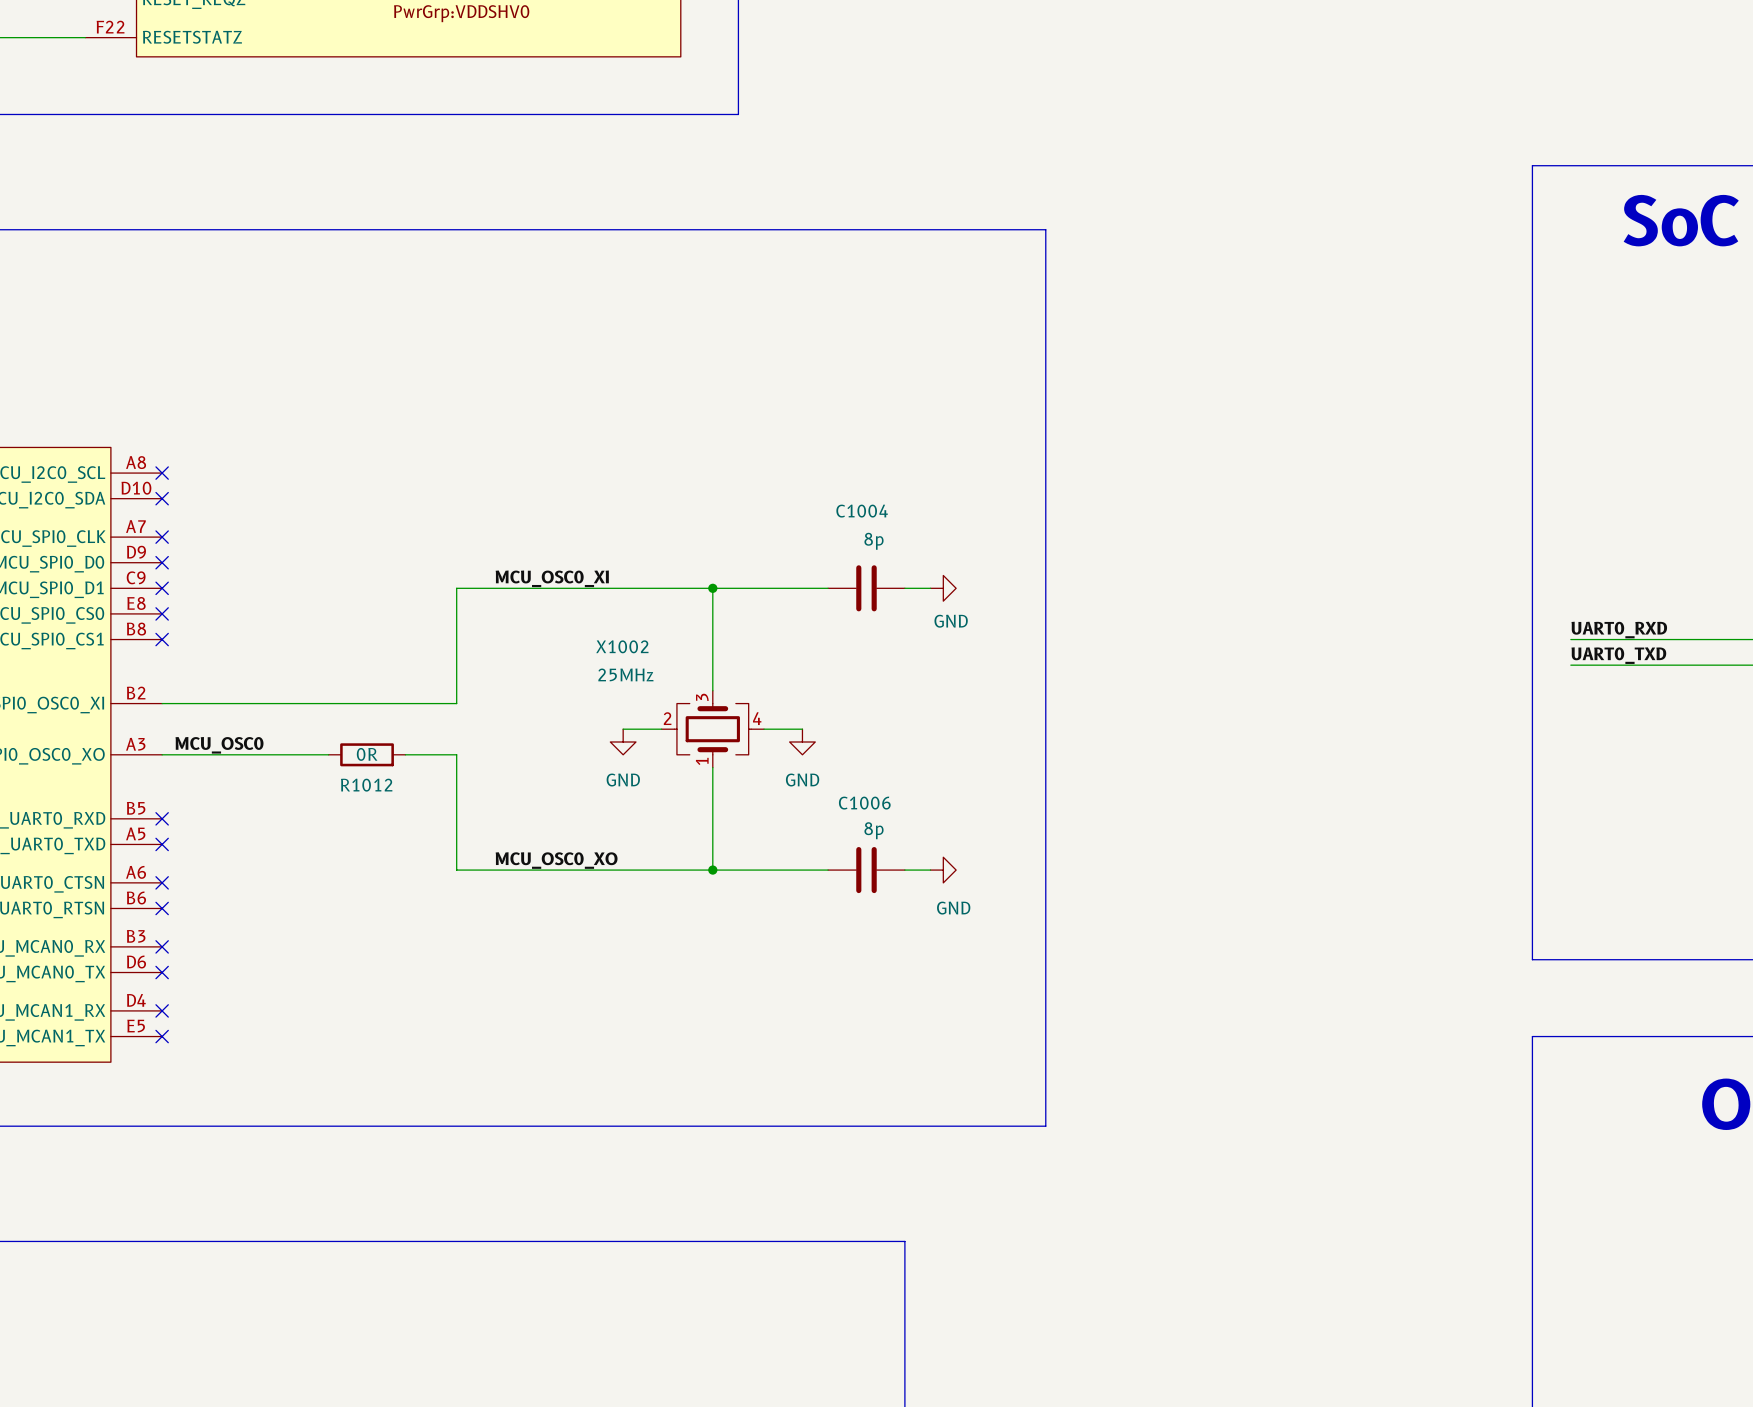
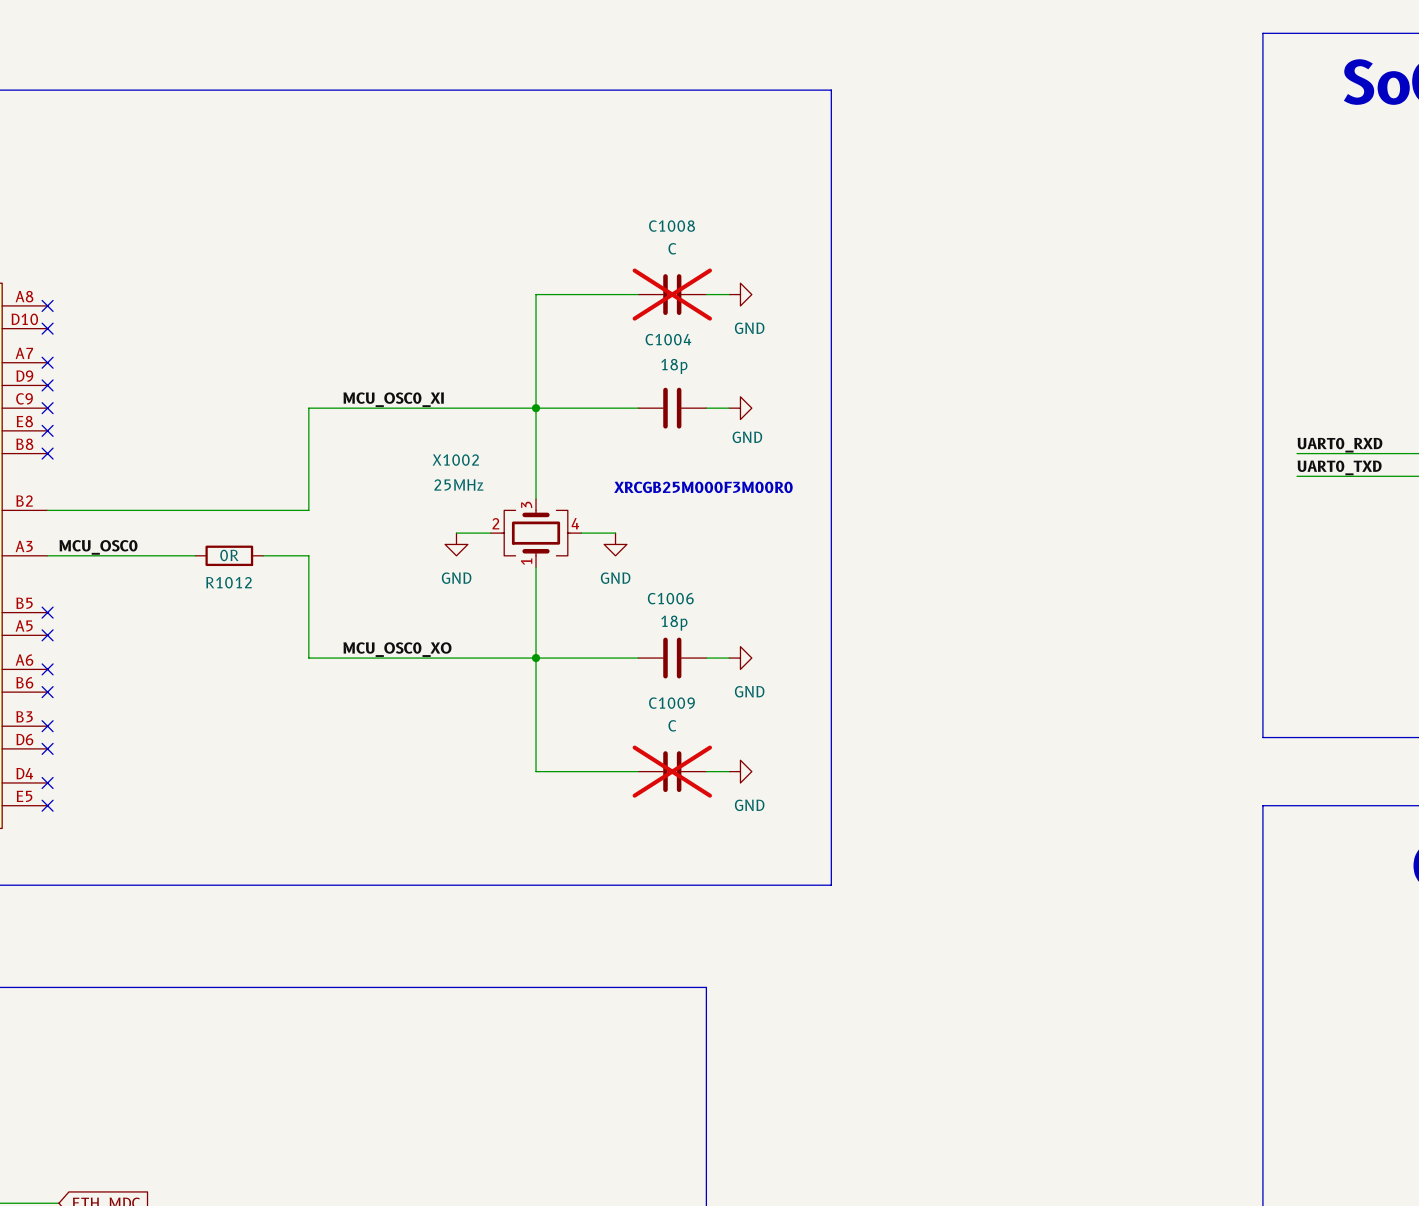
wire: none -> (638, 294) (536, 294) (536, 408)
C1008: none -> C (672, 294)
wire: none -> (706, 294) (729, 294)
power symbol: none -> GND (740, 294)
C1004 value: 8p (874, 541) -> 18p (674, 366)
text: none -> XRCGB25M000F3M00R0 (703, 487)
C1006 value: 8p (874, 830) -> 18p (674, 623)
wire: none -> (536, 658) (536, 771) (638, 771)
C1009: none -> C (672, 771)
wire: none -> (706, 771) (729, 771)
power symbol: none -> GND (740, 771)

